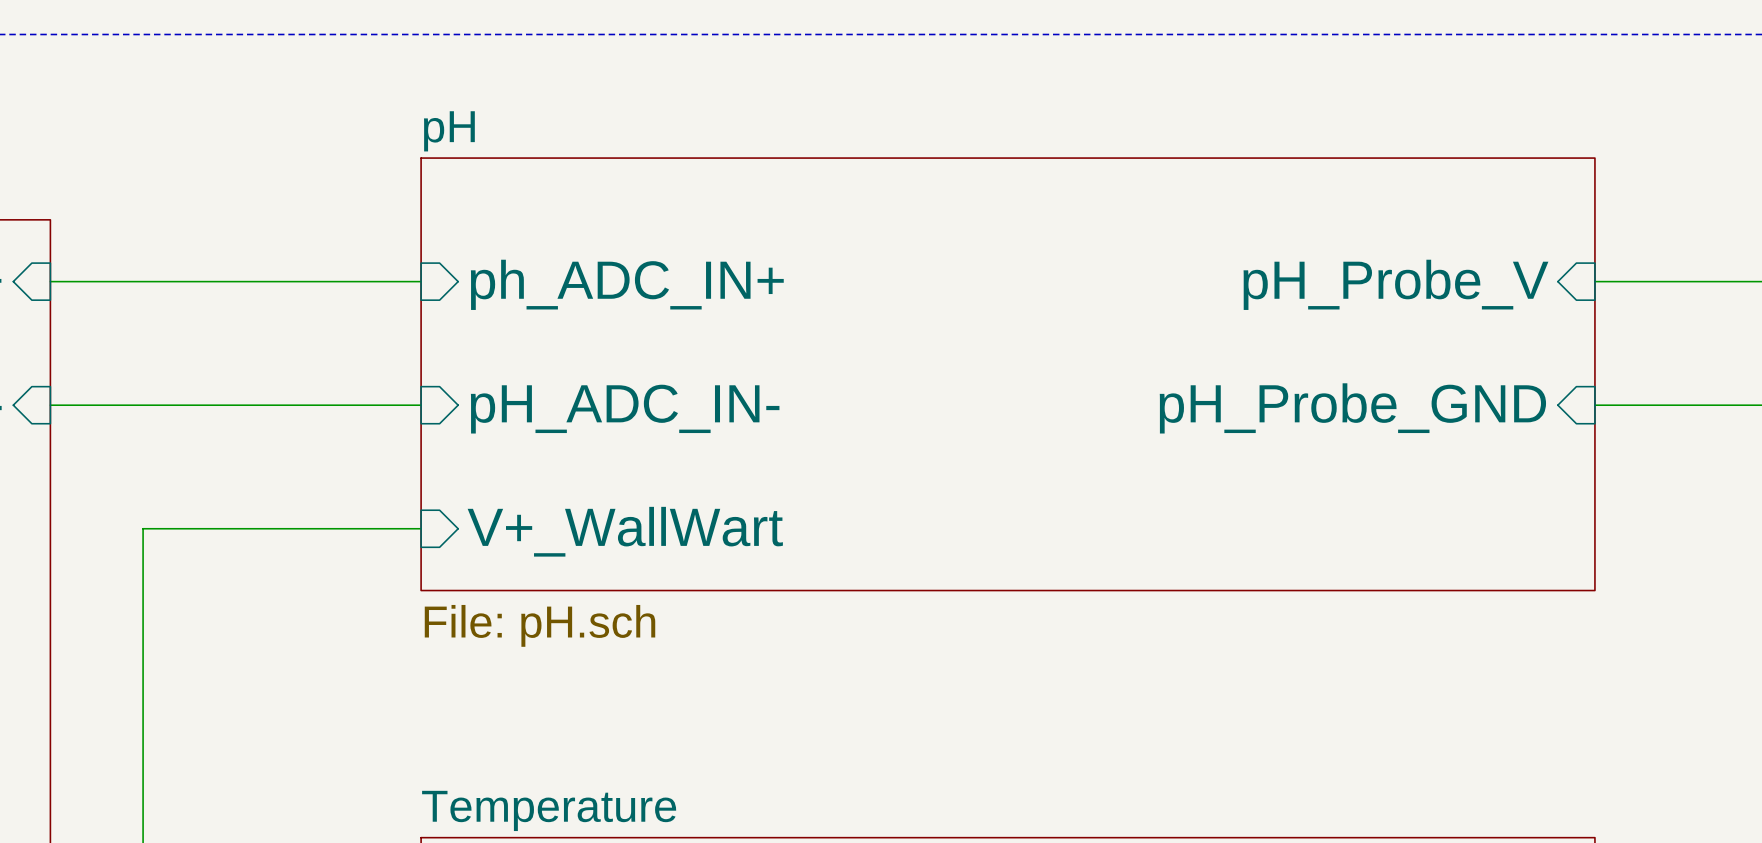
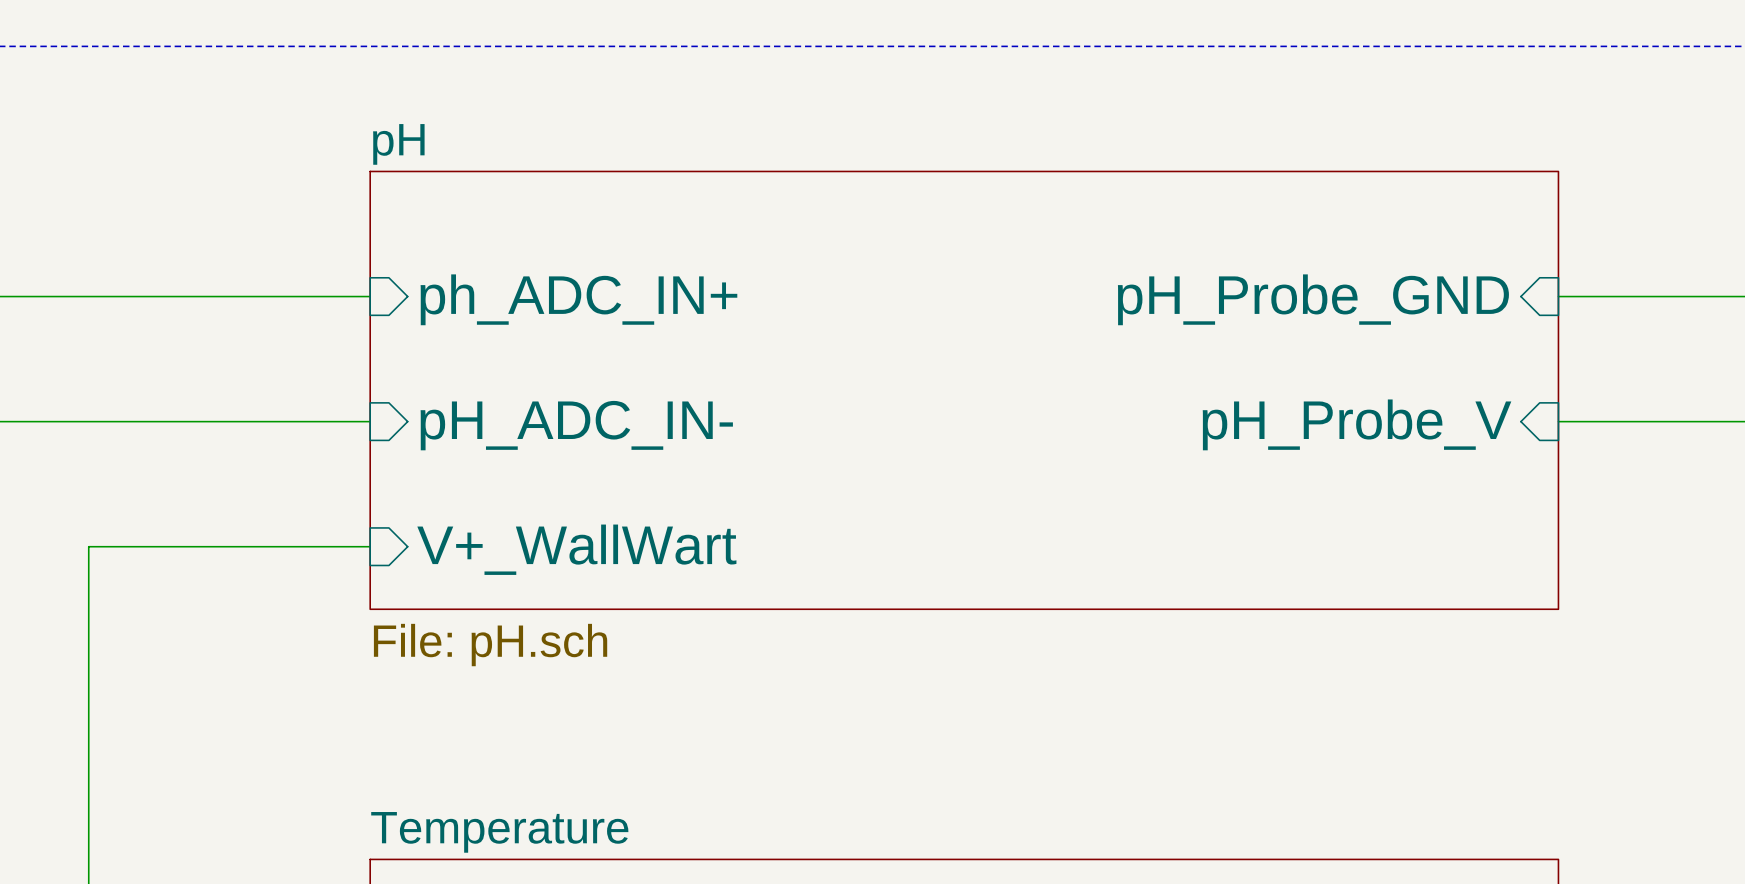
sheet pin: pH_Probe_V (1395, 284) -> pH_Probe_GND (1313, 299)
sheet pin: pH_Probe_GND (1352, 408) -> pH_Probe_V (1357, 424)

